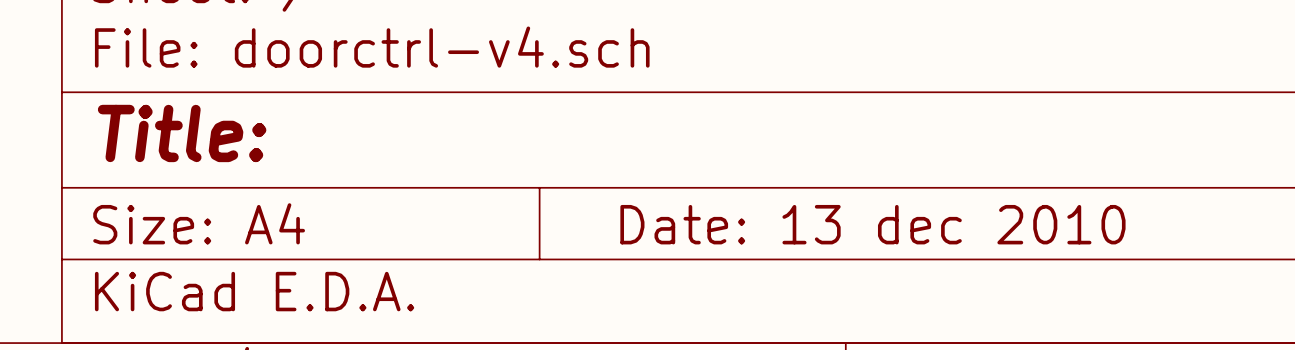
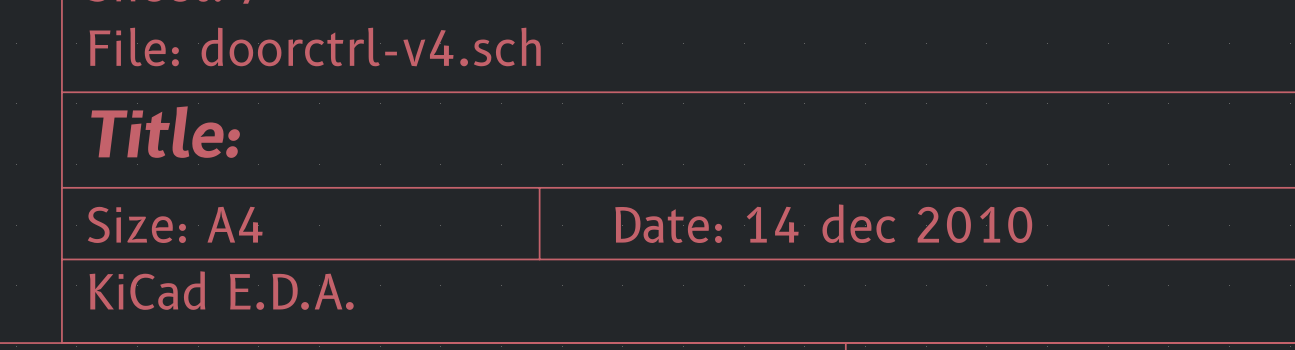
title block: Date: 13 dec 2010 (872, 224) -> Date: 14 dec 2010 (823, 223)

